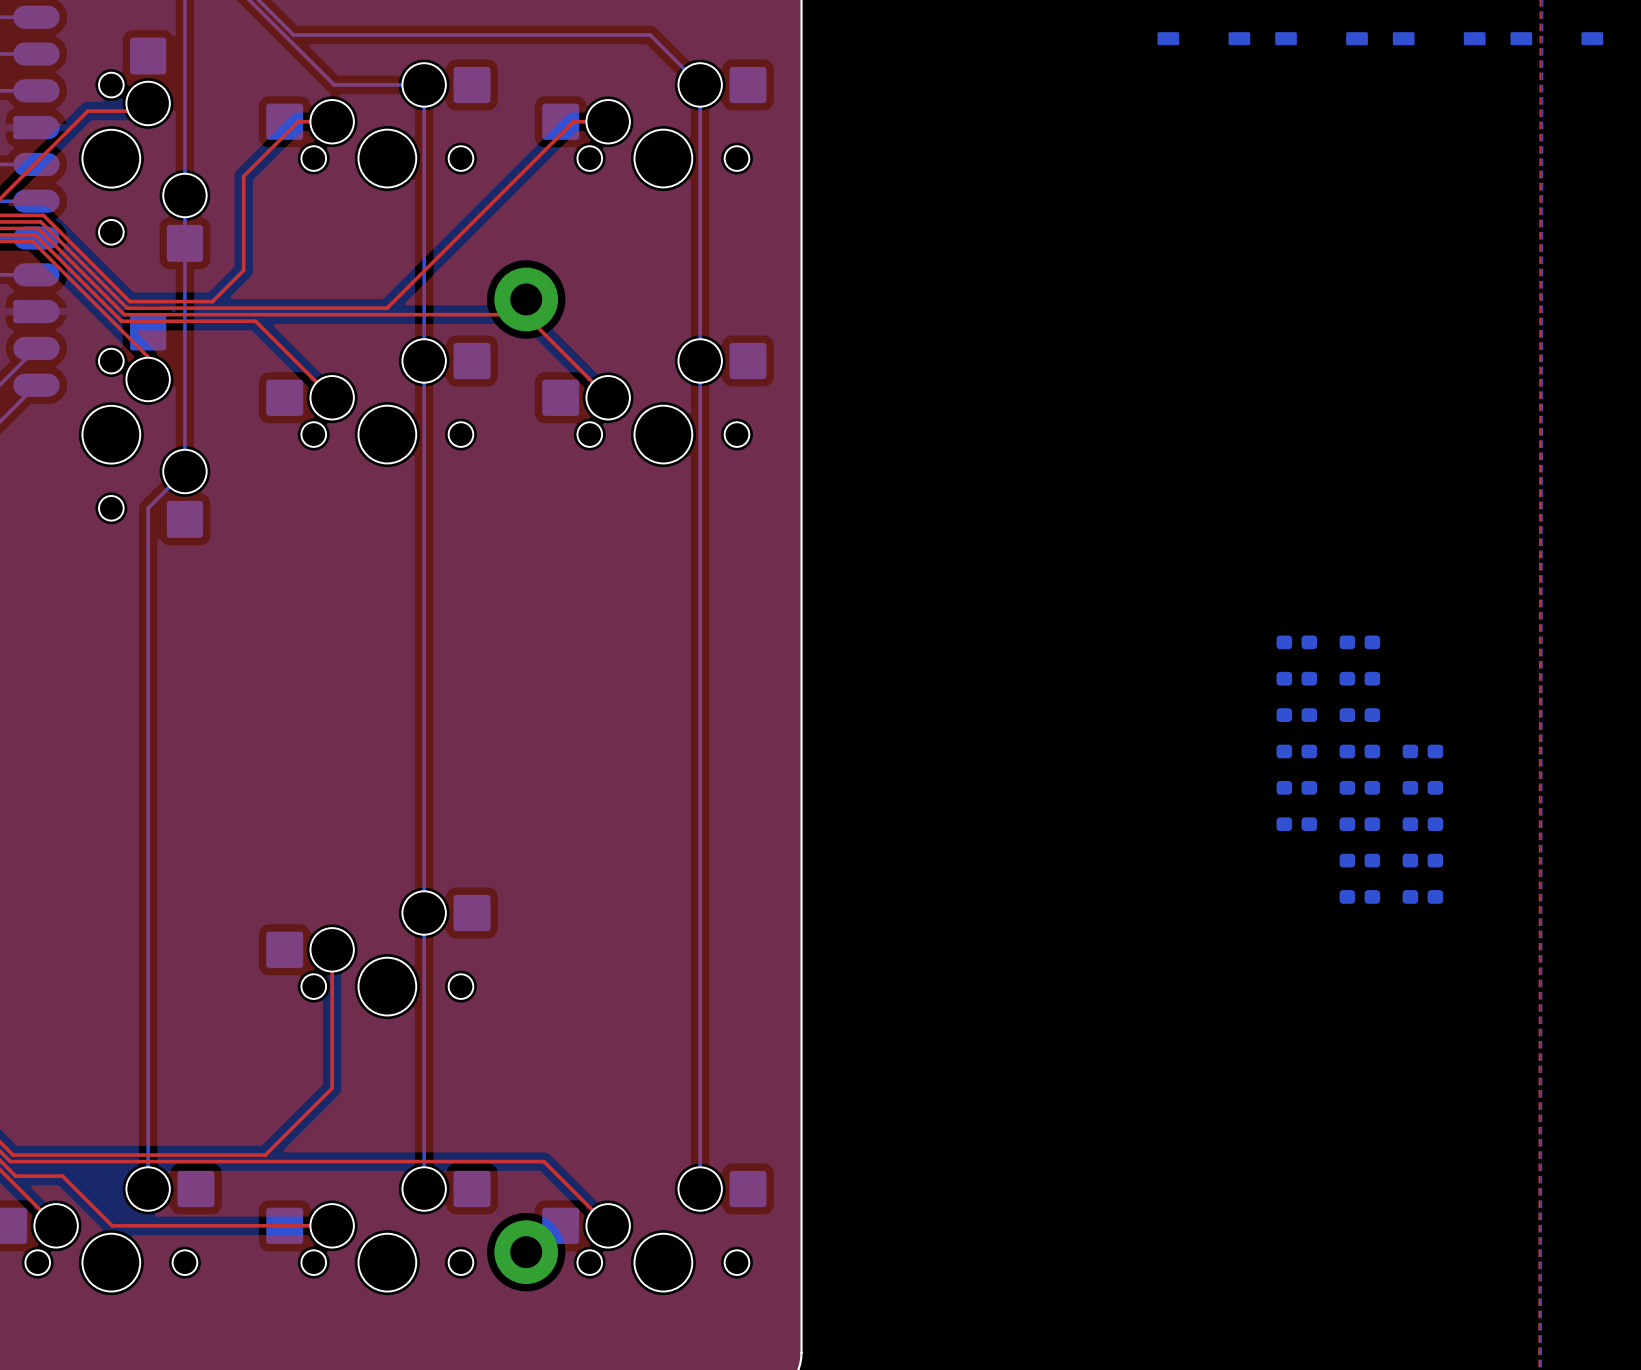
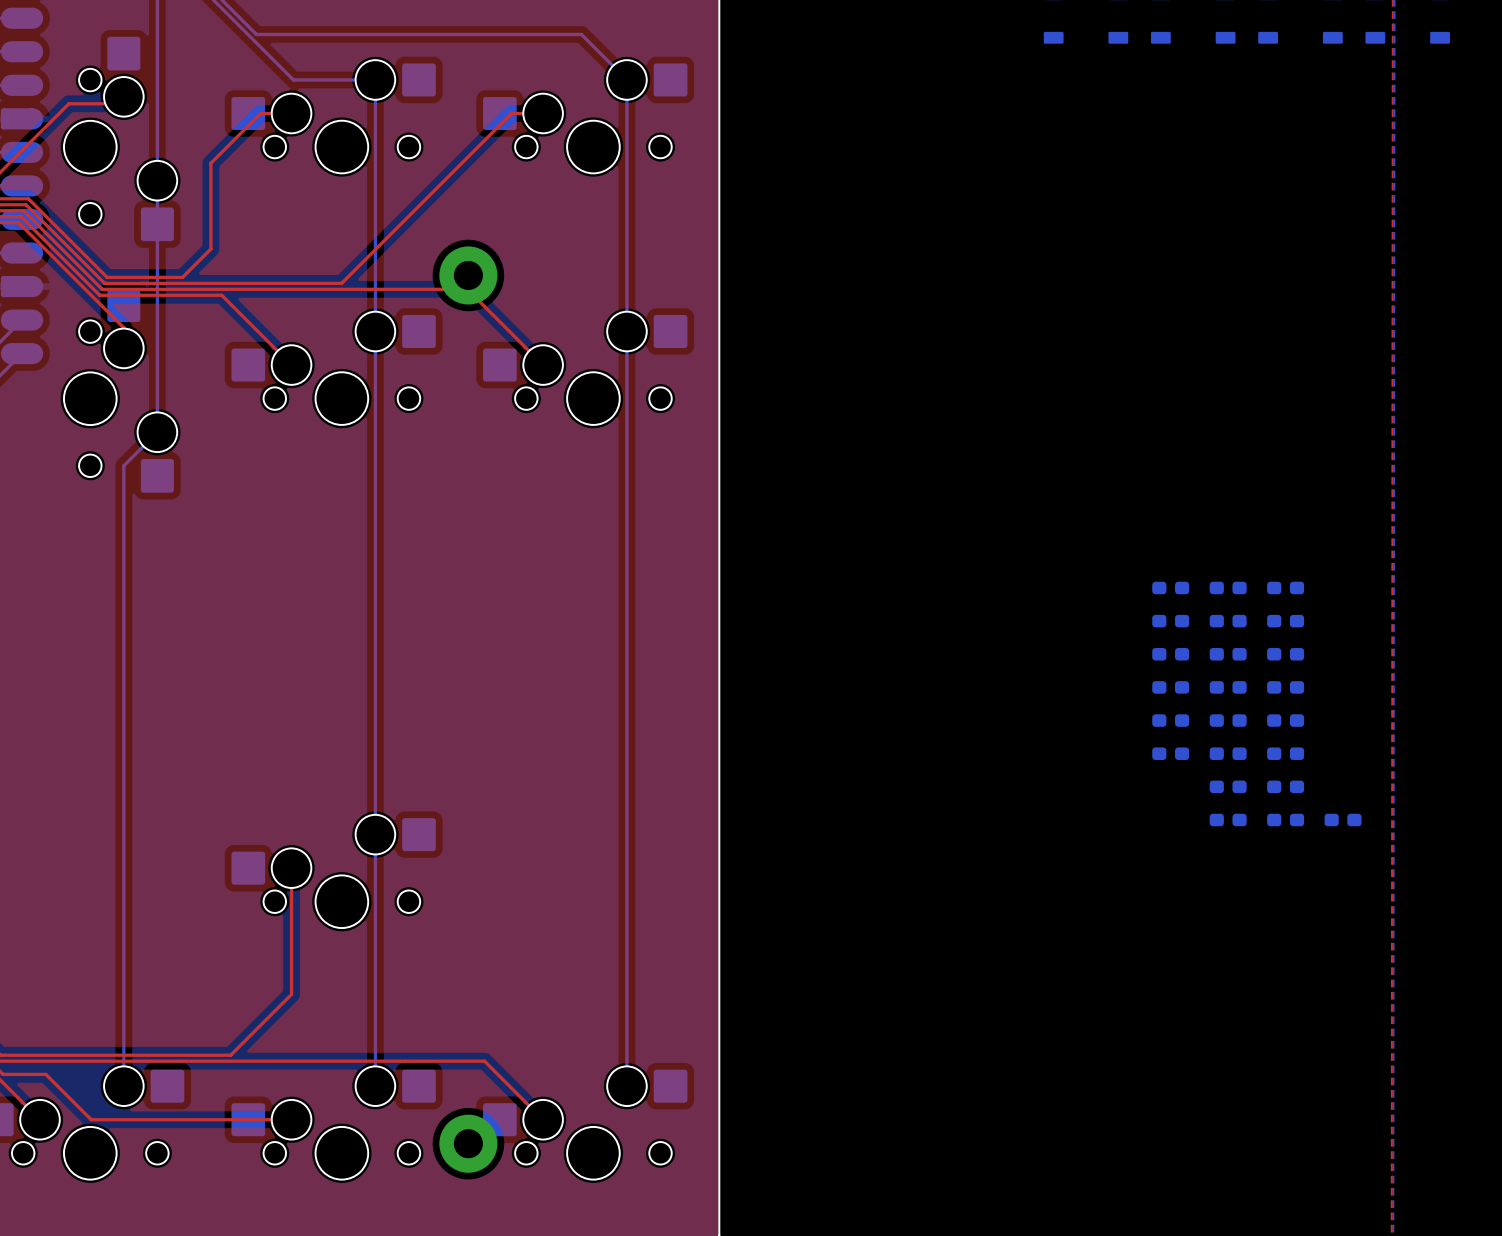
part: none -> (1285, 587)
part: none -> (1285, 621)
part: none -> (1285, 654)
part: none -> (1343, 819)

